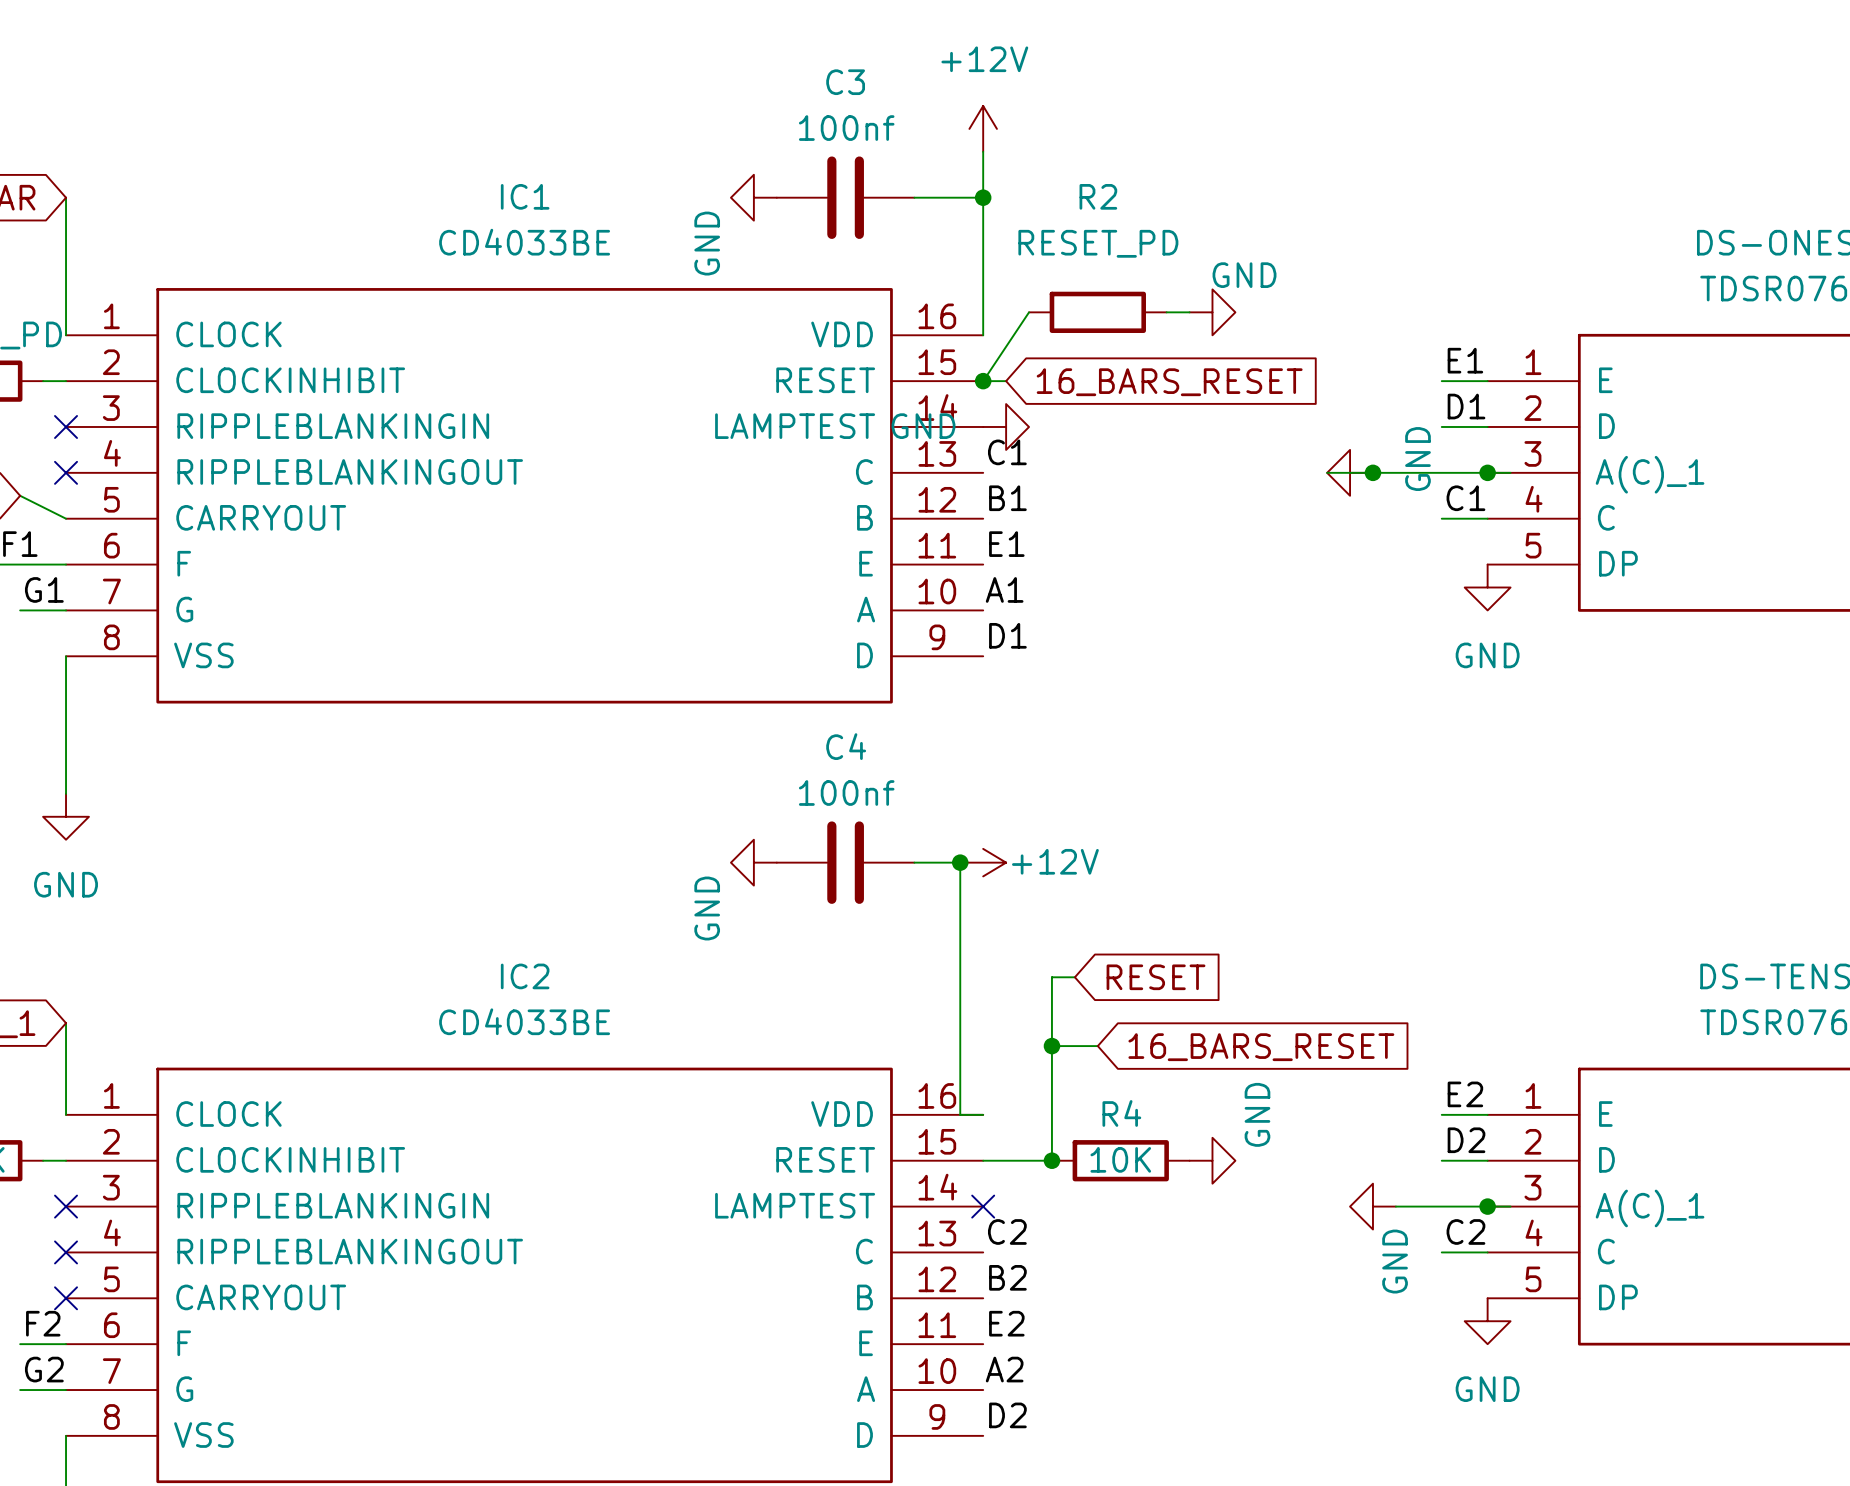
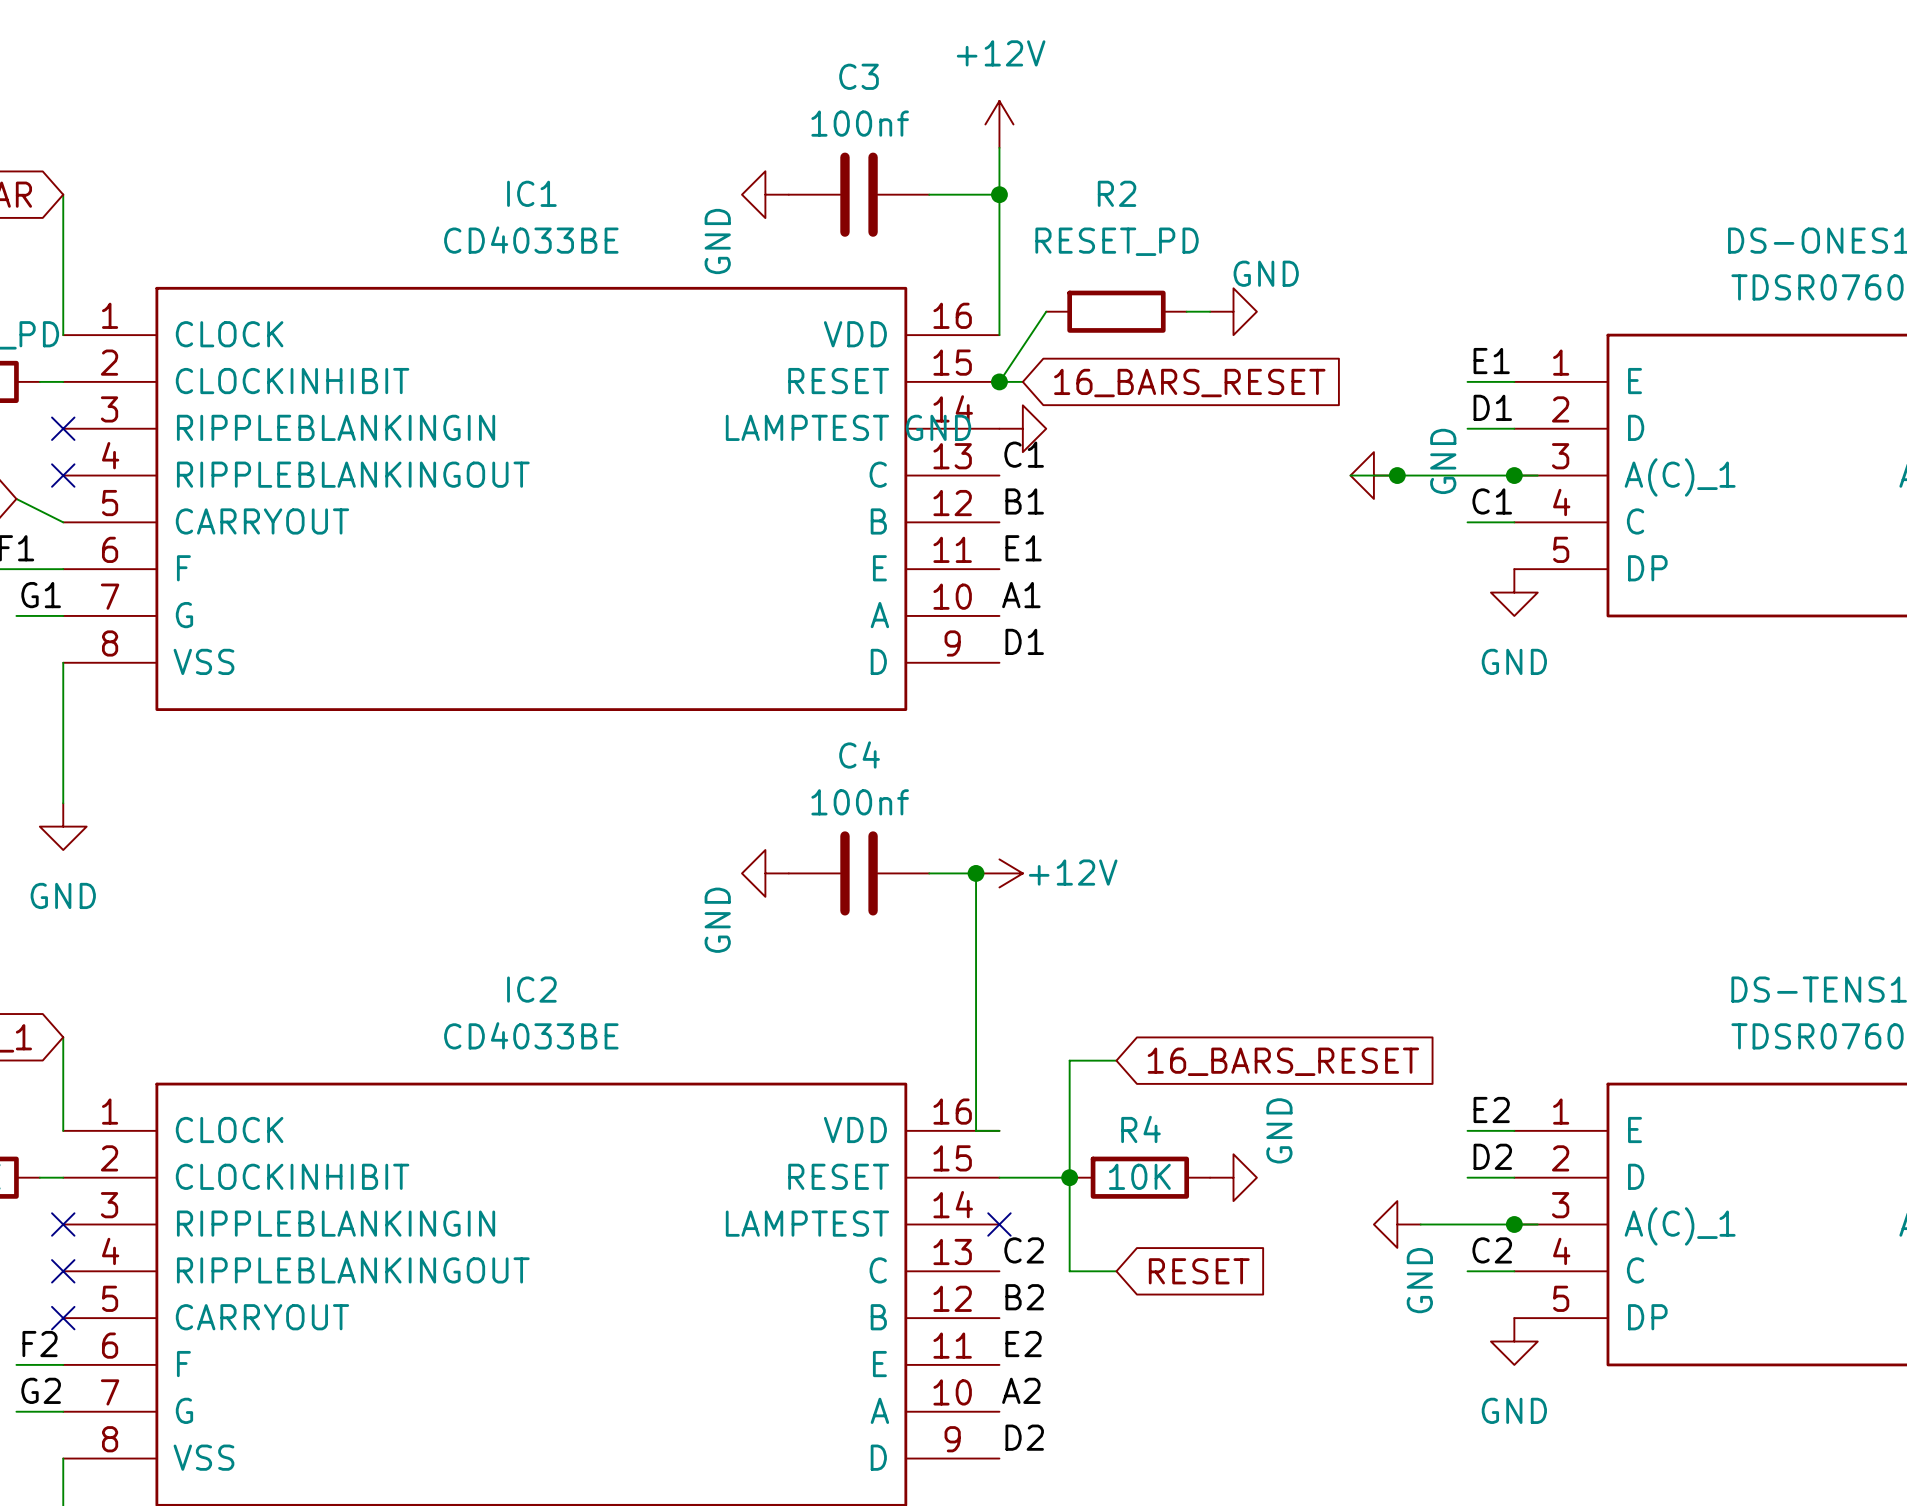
wire: (1074, 977) (1051, 977) (1051, 1046) -> none
global label position: RESET (1156, 977) -> RESET (1199, 1271)
junction: (1051, 1046) -> none
wire: none -> (1069, 1177) (1069, 1271) (1116, 1271)

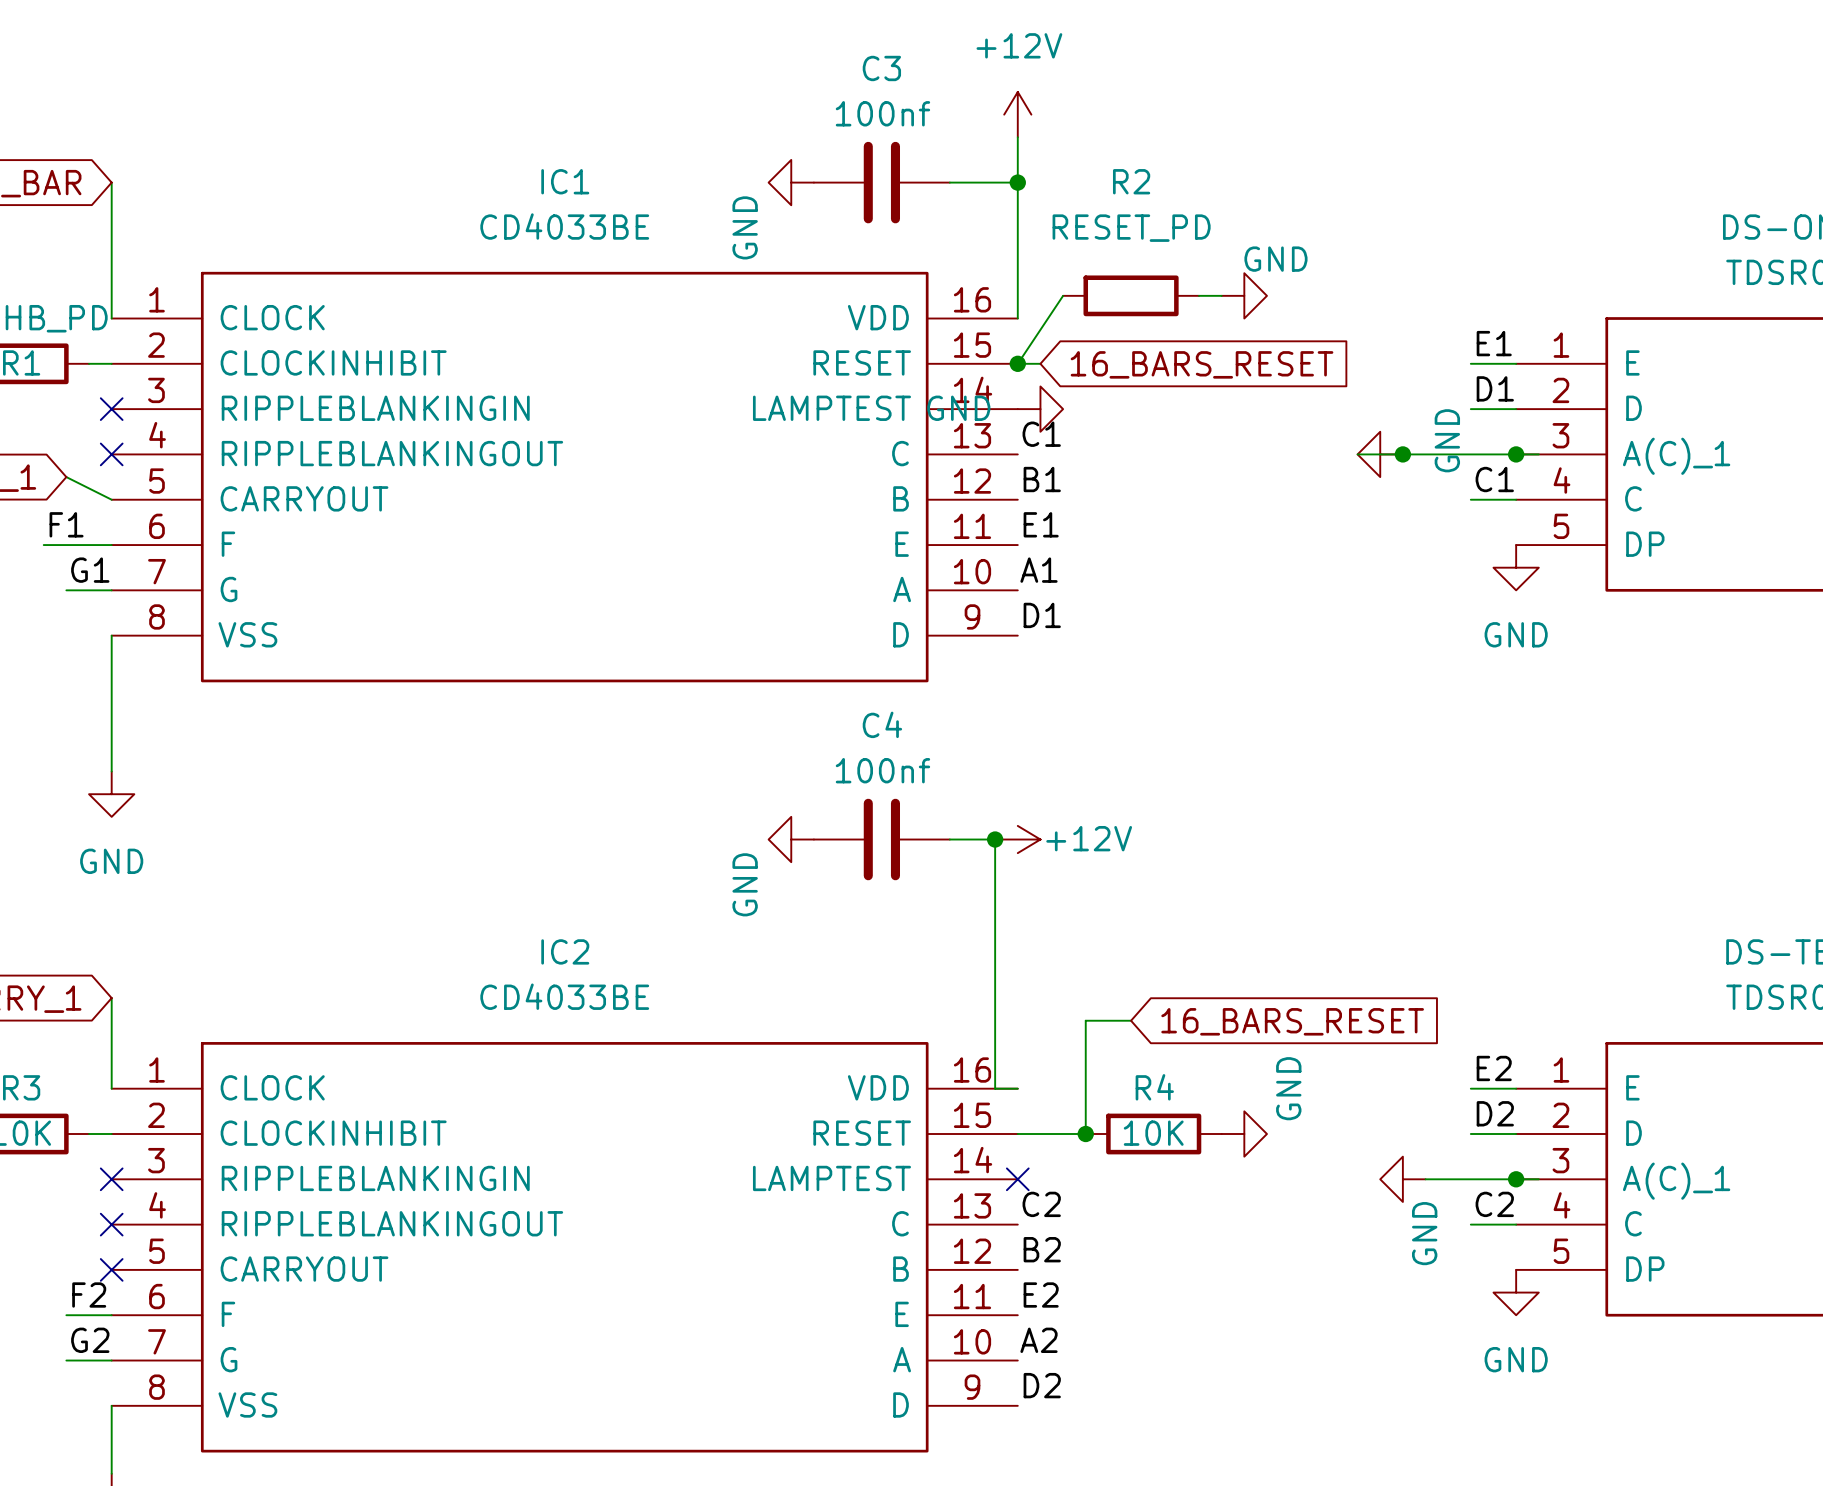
wire: (1069, 1177) (1069, 1271) (1116, 1271) -> none
global label: RESET (1199, 1271) -> none

